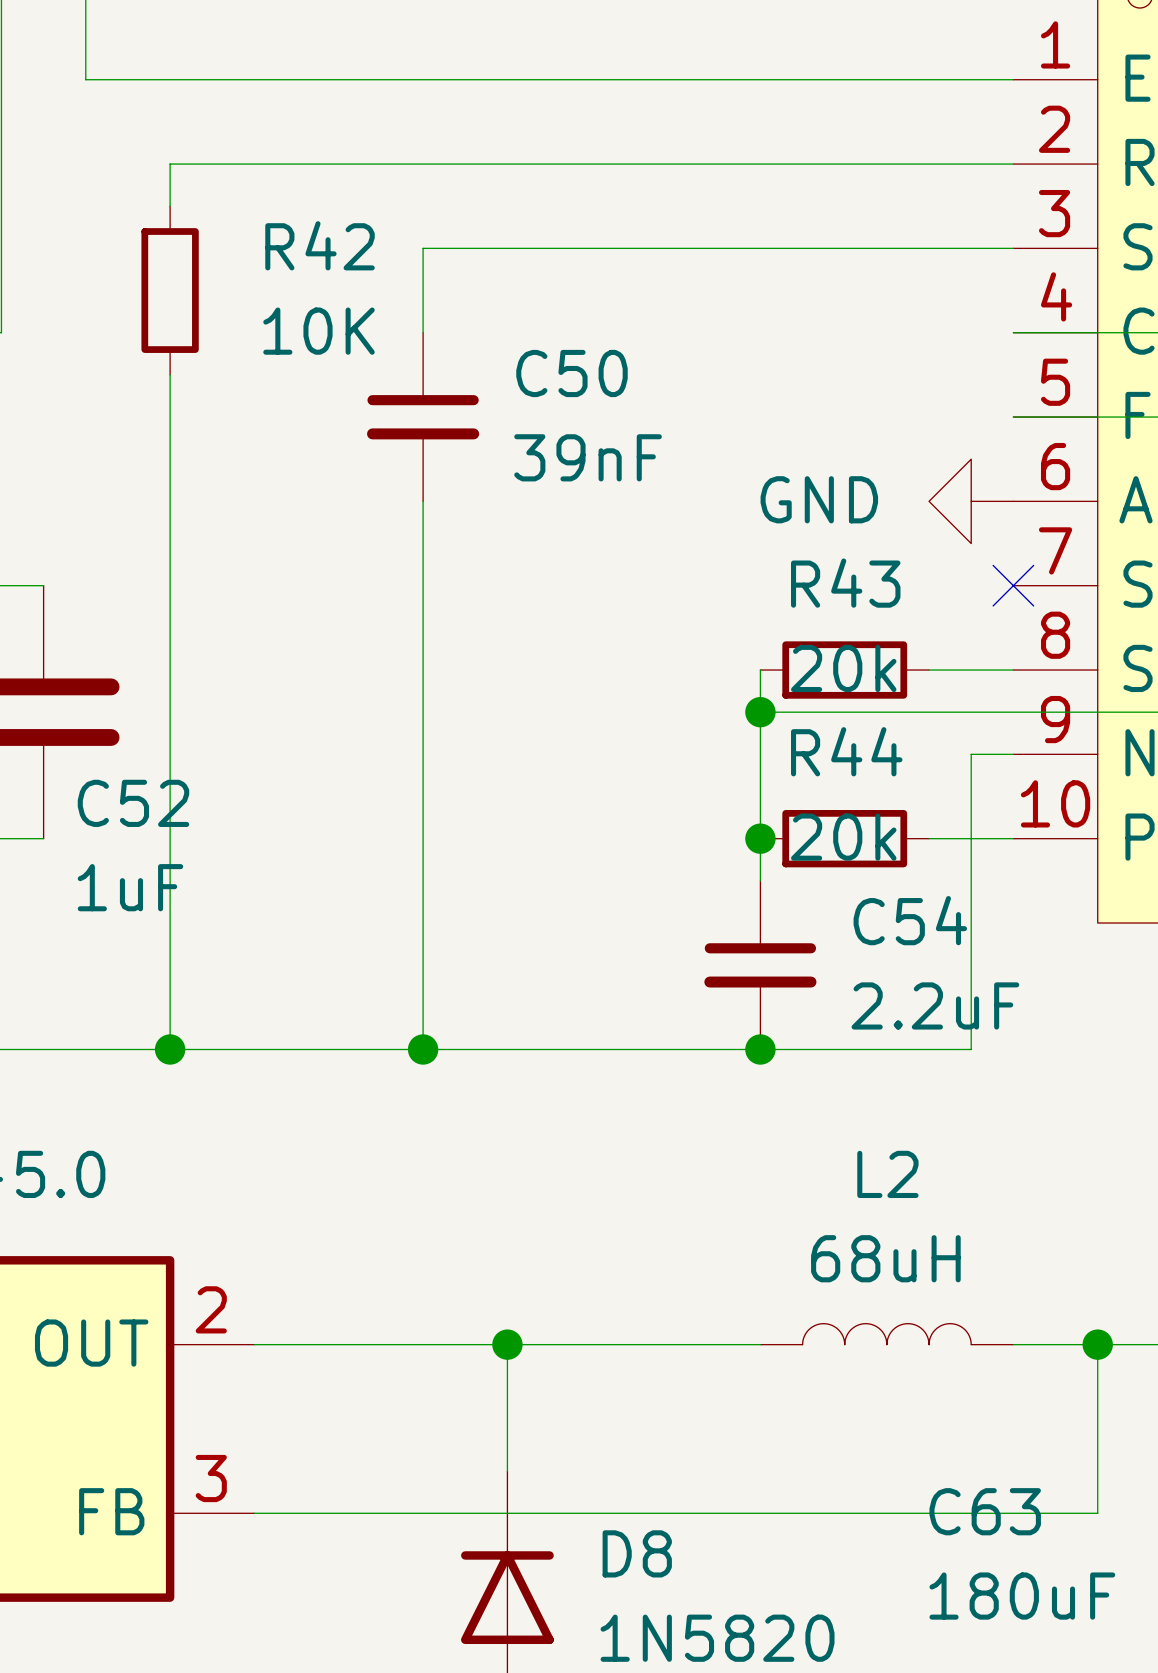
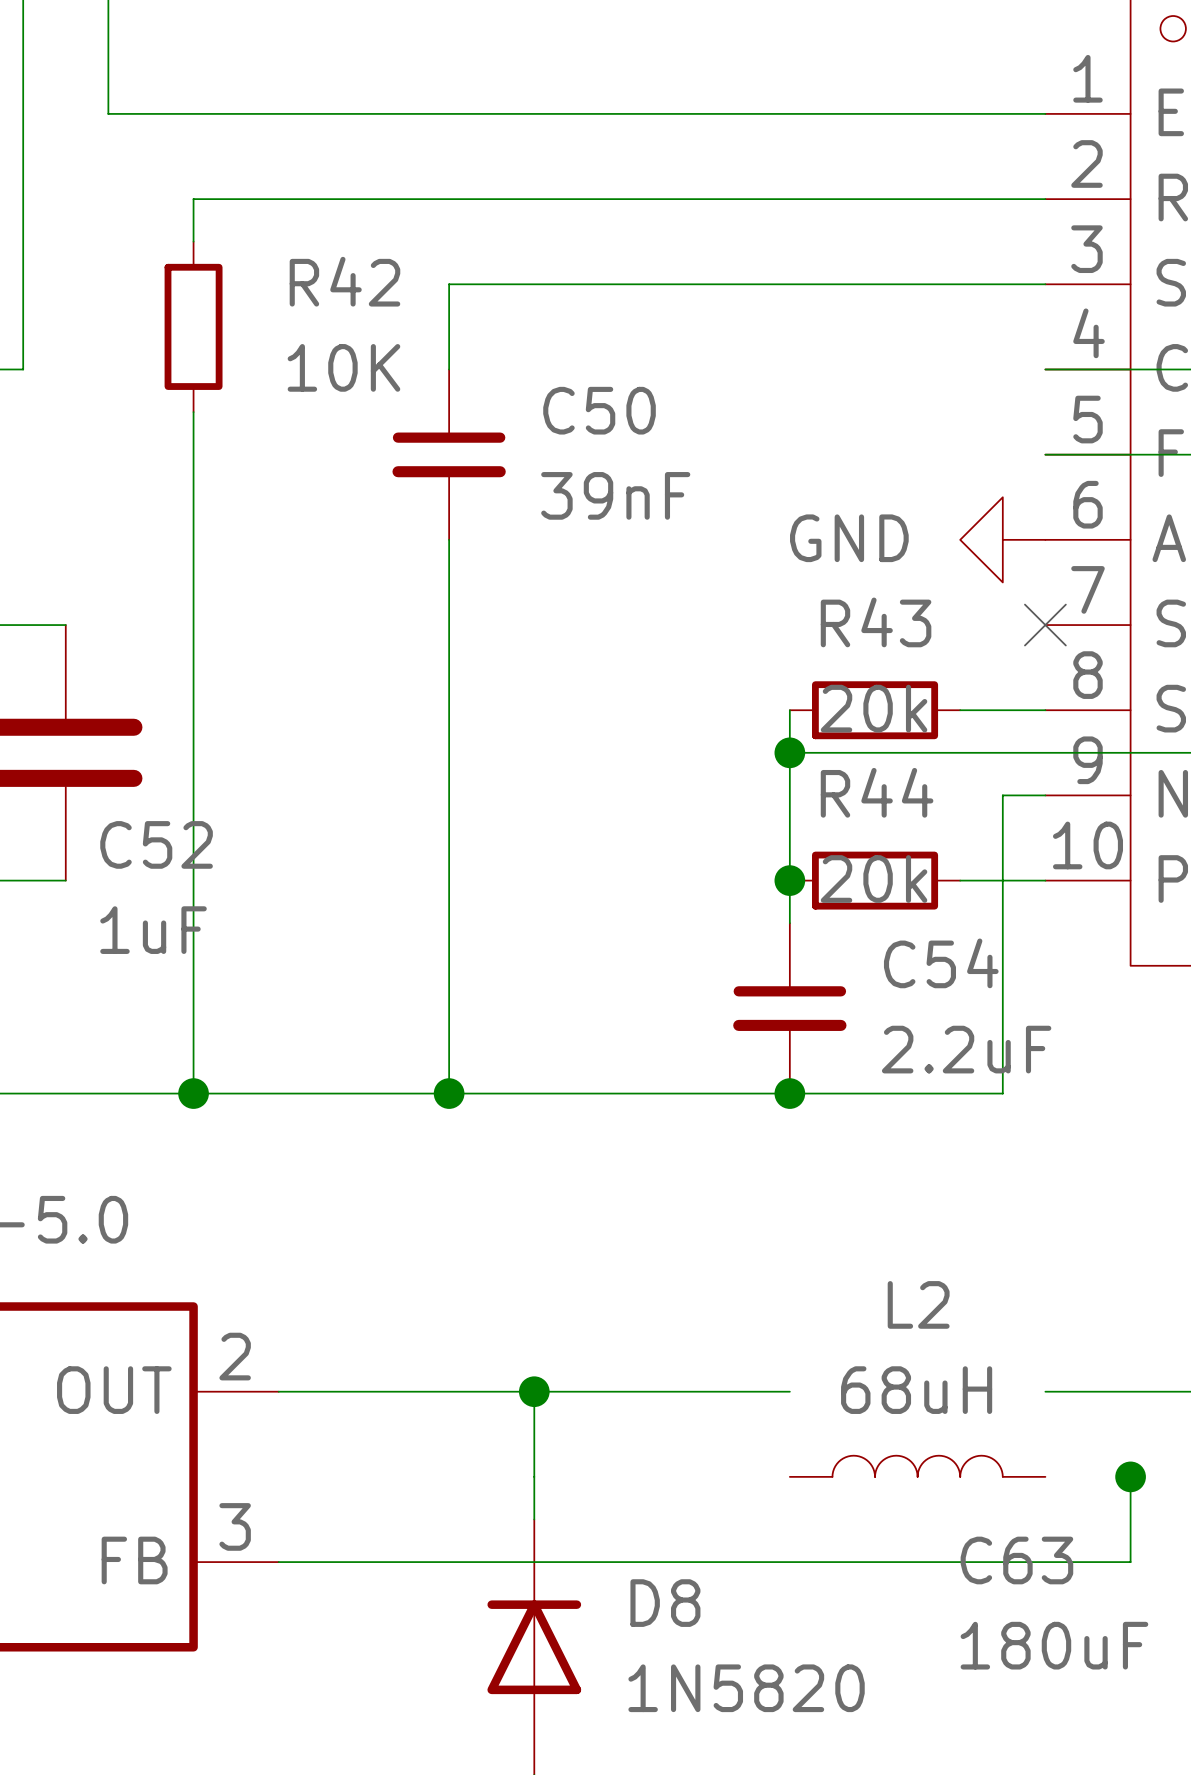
L2 position: (886, 1334) -> (917, 1466)
wire: (1097, 1344) (1097, 1428) -> none
junction: (1097, 1344) -> none
junction: none -> (1130, 1476)

